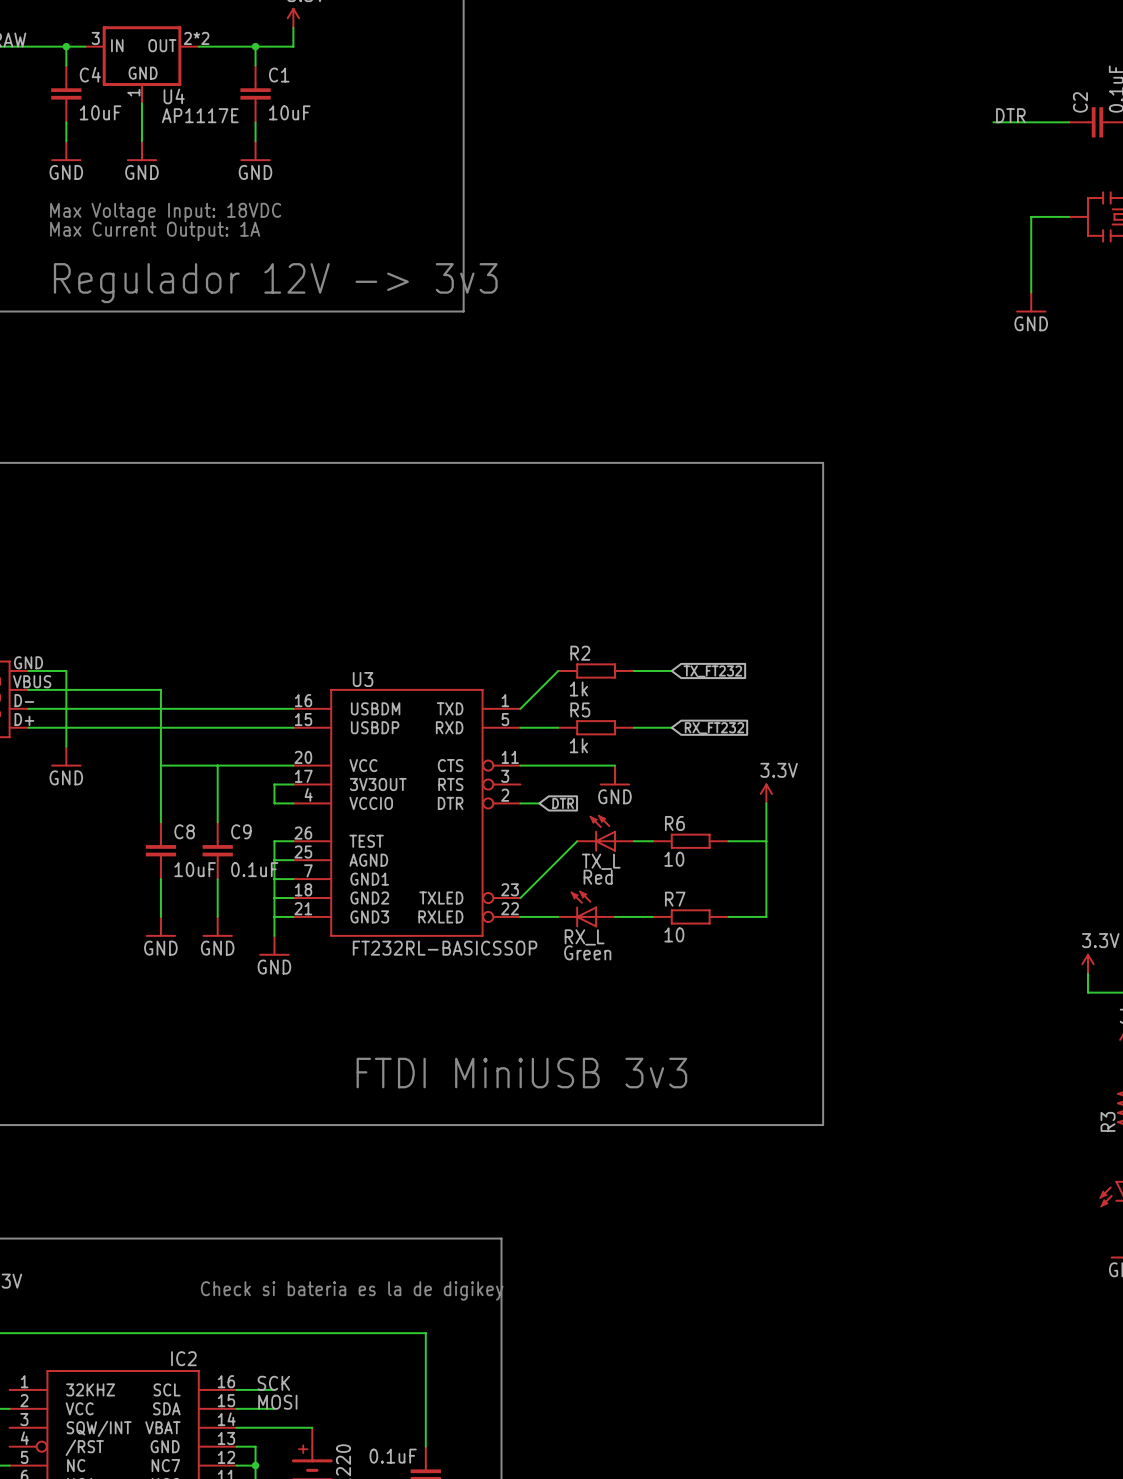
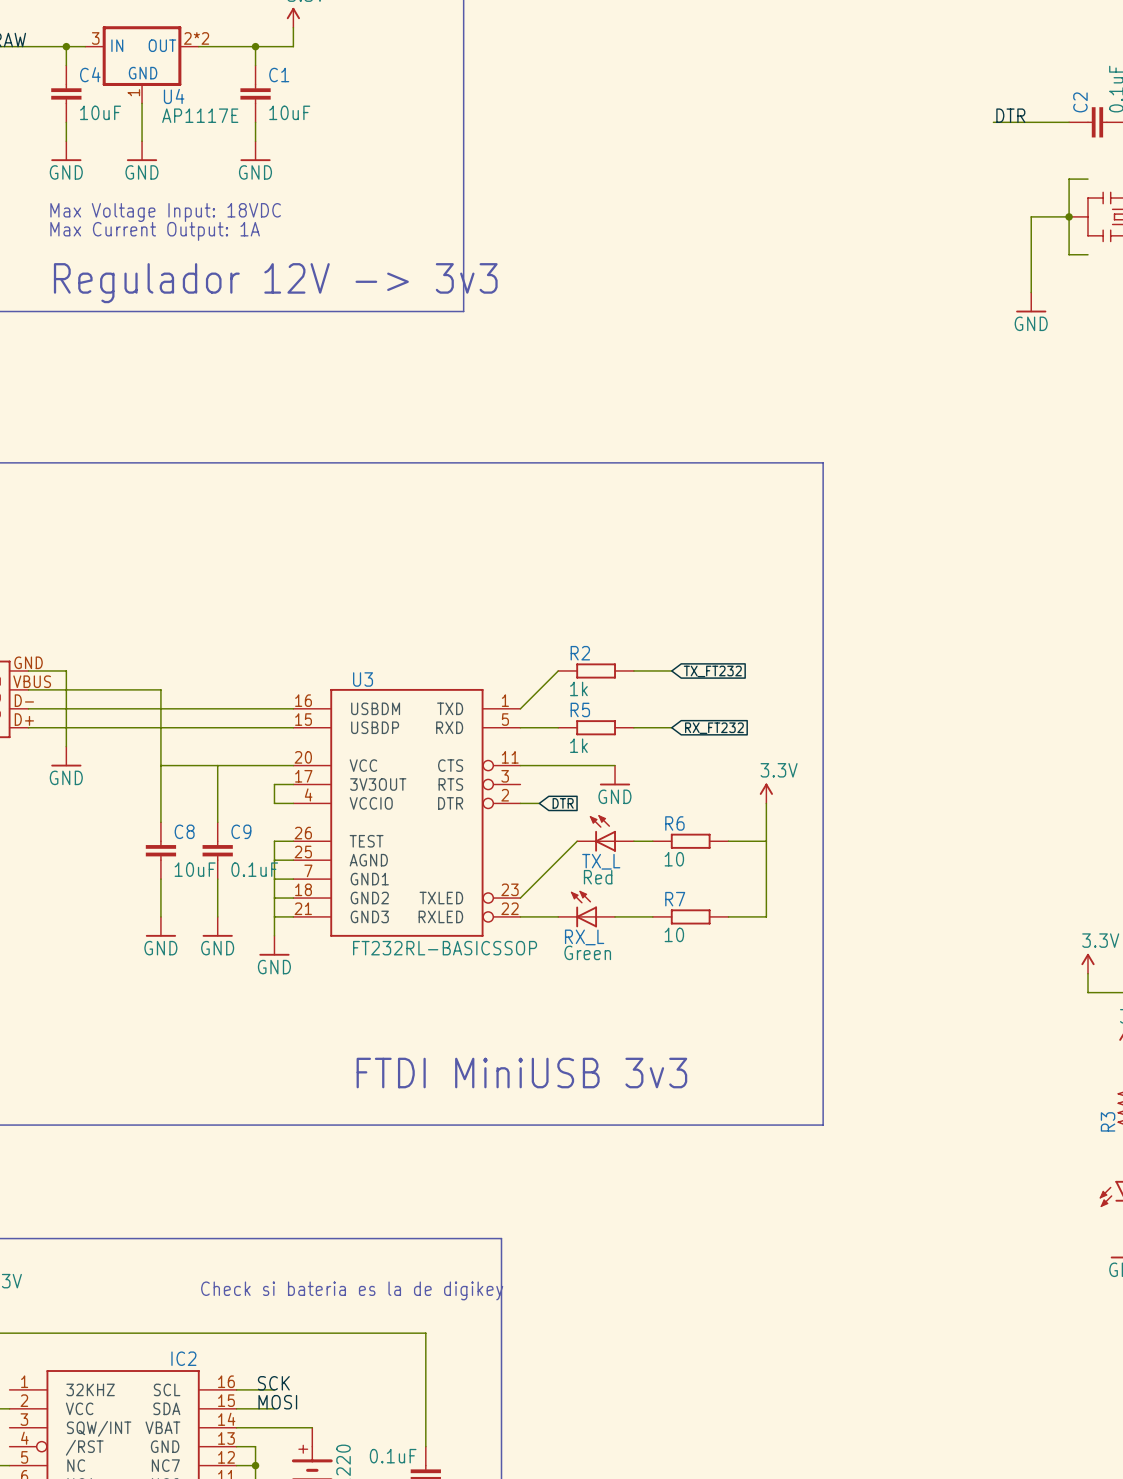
wire: none -> (1088, 179) (1069, 179) (1069, 254) (1088, 254)
junction: none -> (1069, 216)

